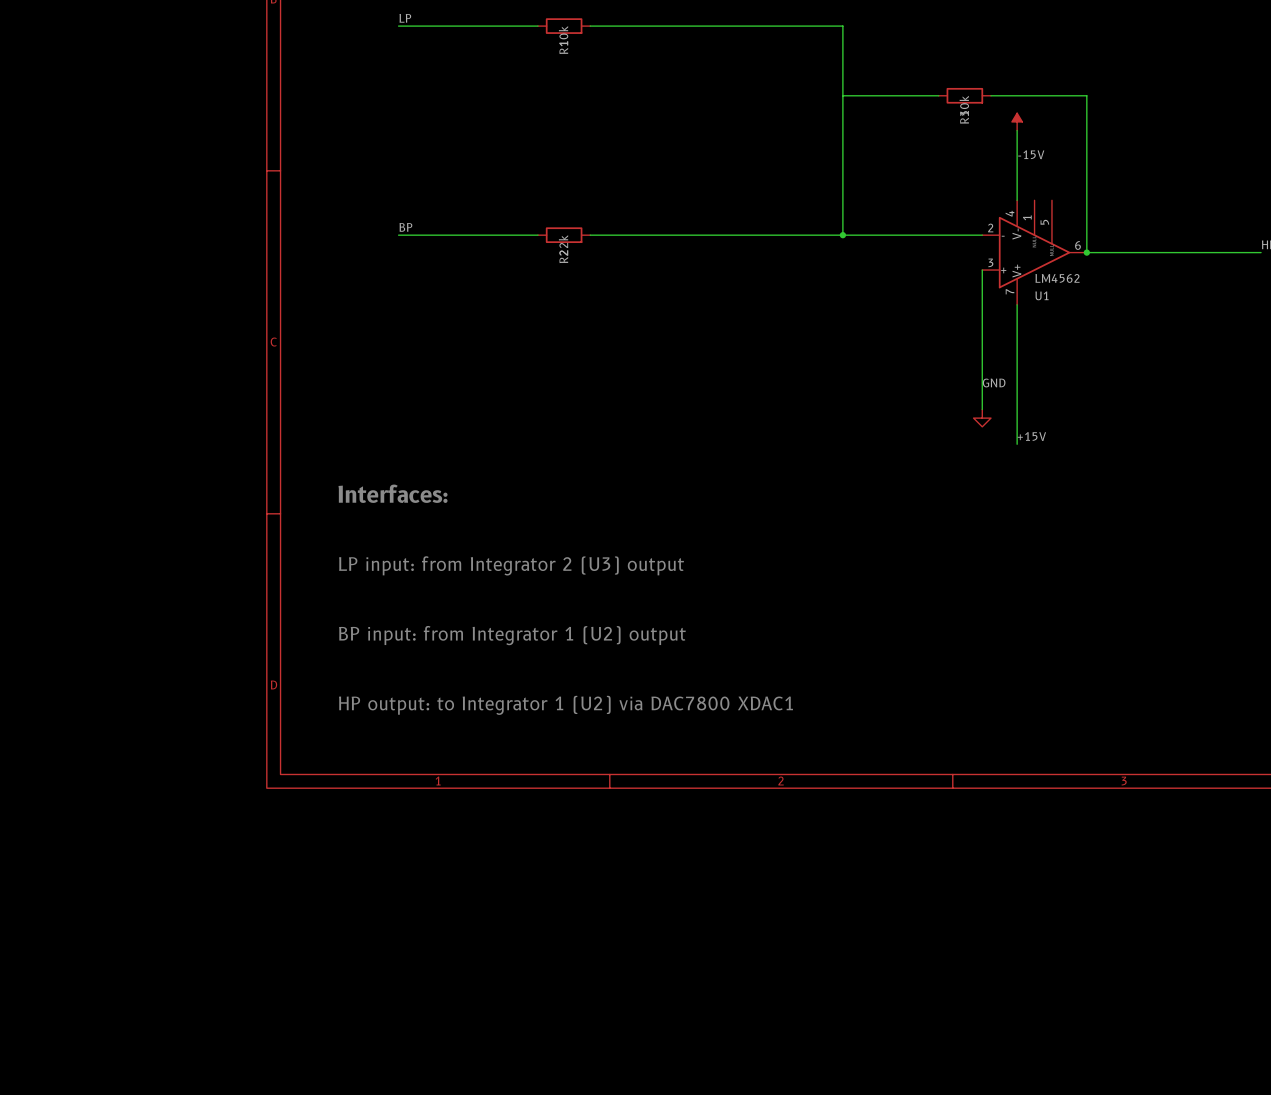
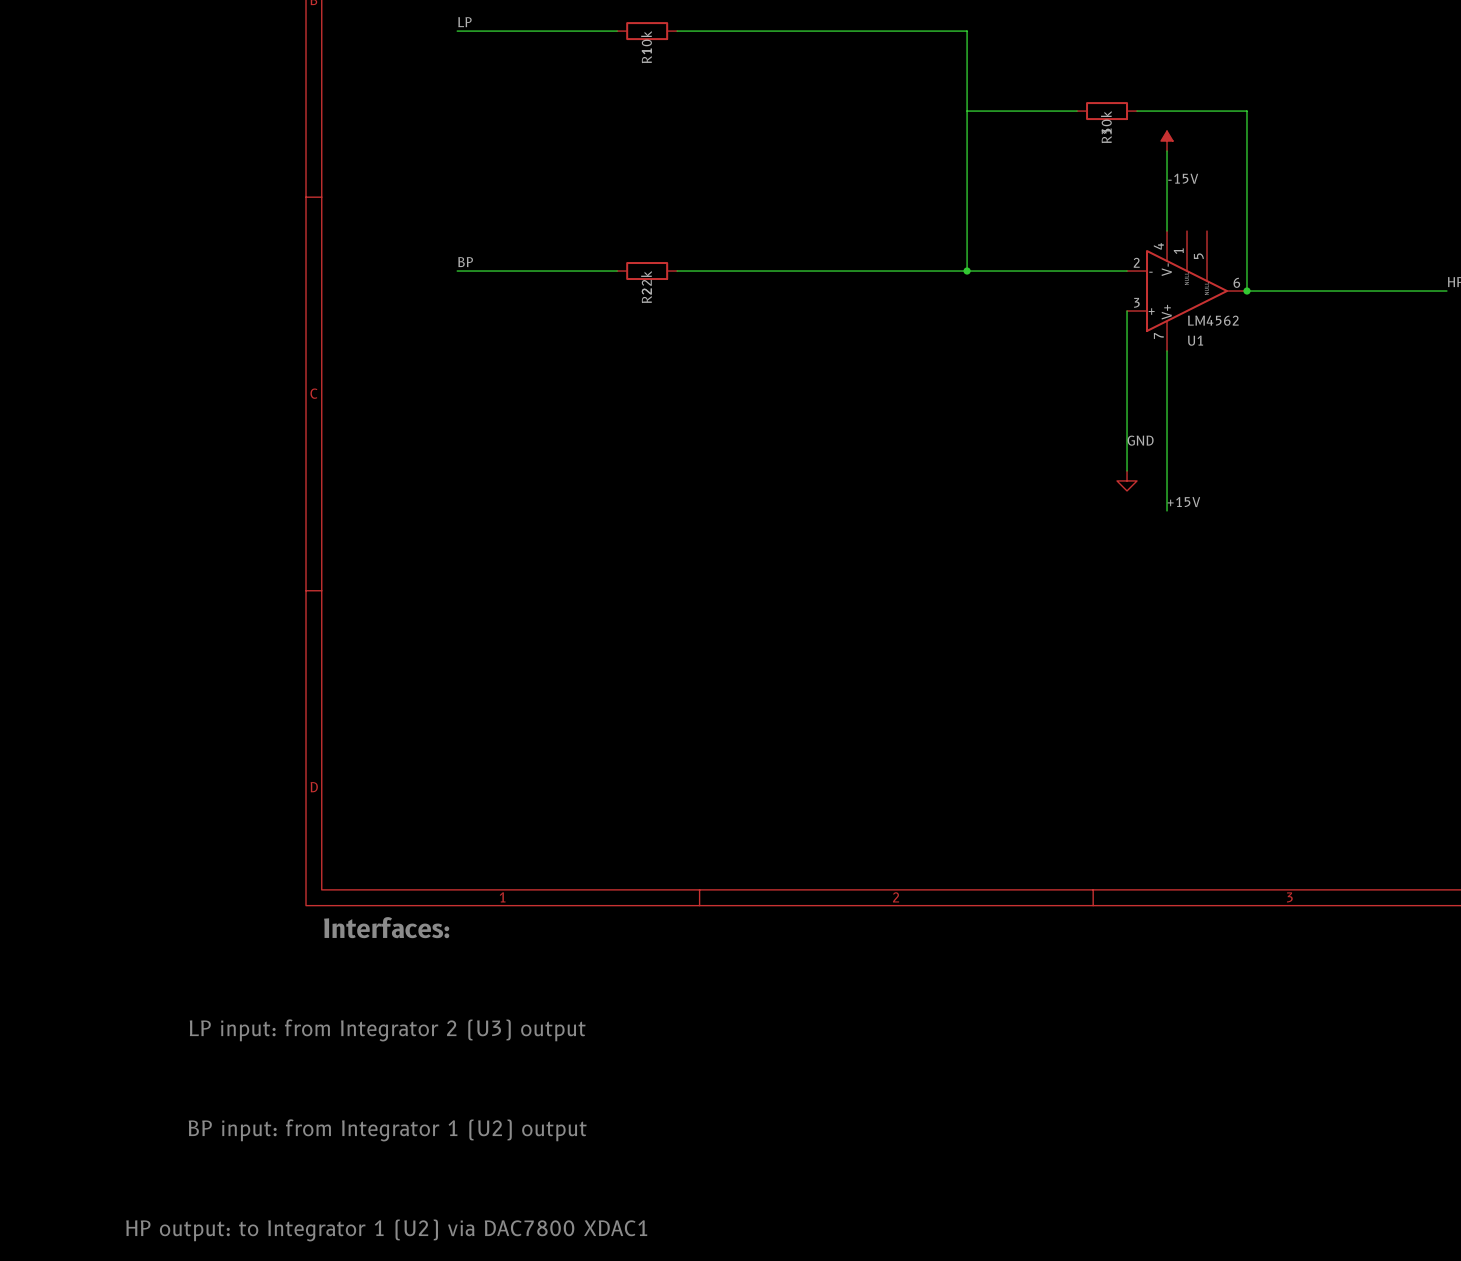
text: Interfaces: (393, 493) -> none
text: LP input: from Integrator 2 (U3) output (511, 565) -> none
text: BP input: from Integrator 1 (U2) output (512, 635) -> none
text: HP output: to Integrator 1 (U2) via DAC7800 XDAC1 (565, 705) -> none
text: none -> Interfaces: (386, 927)
text: none -> LP input: from Integrator 2 (U3) output (387, 1030)
text: none -> BP input: from Integrator 1 (U2) output (387, 1130)
text: none -> HP output: to Integrator 1 (U2) via DAC7800 XDAC1 (386, 1230)

